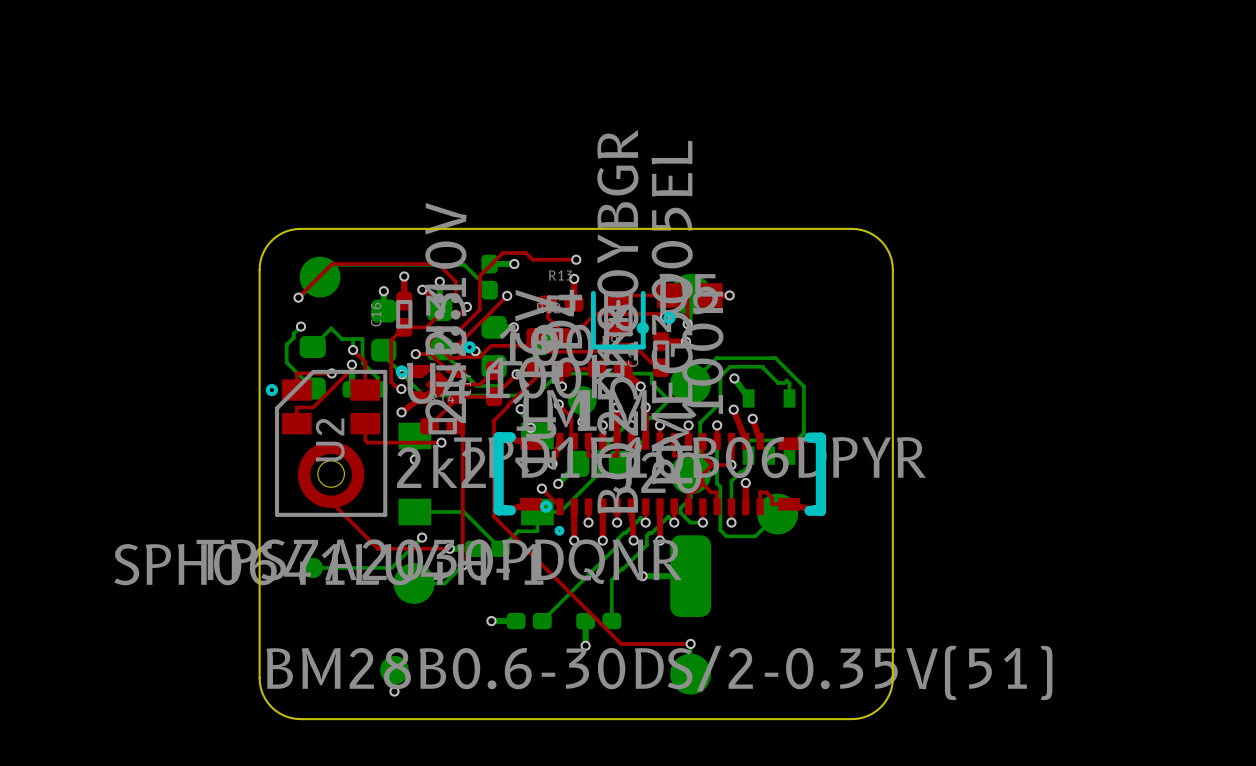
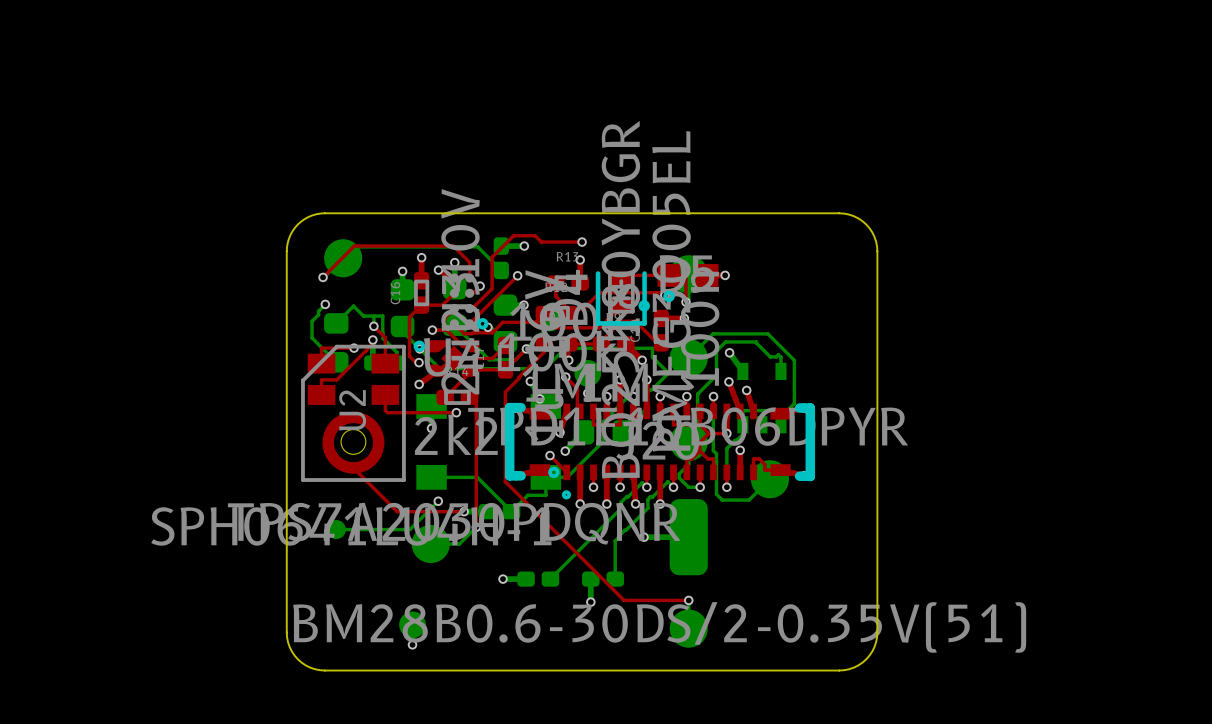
U2 footprint: [265, 369, 388, 517] -> [301, 344, 406, 482]

